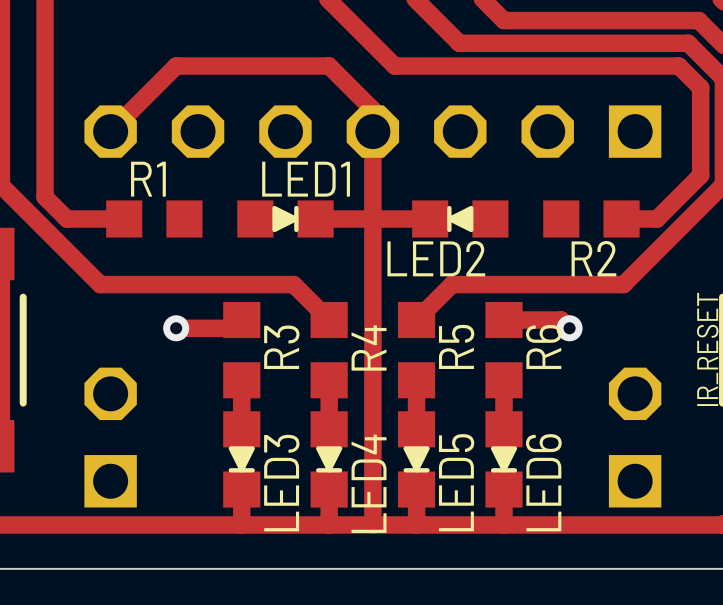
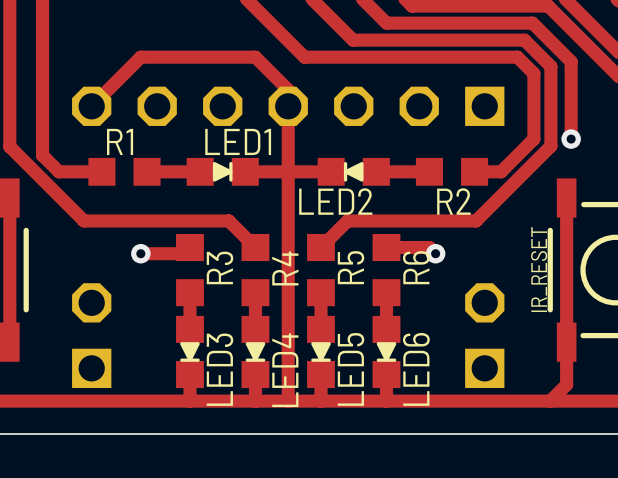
track: none -> (147, 171) (200, 171)
track: none -> (376, 171) (429, 171)

